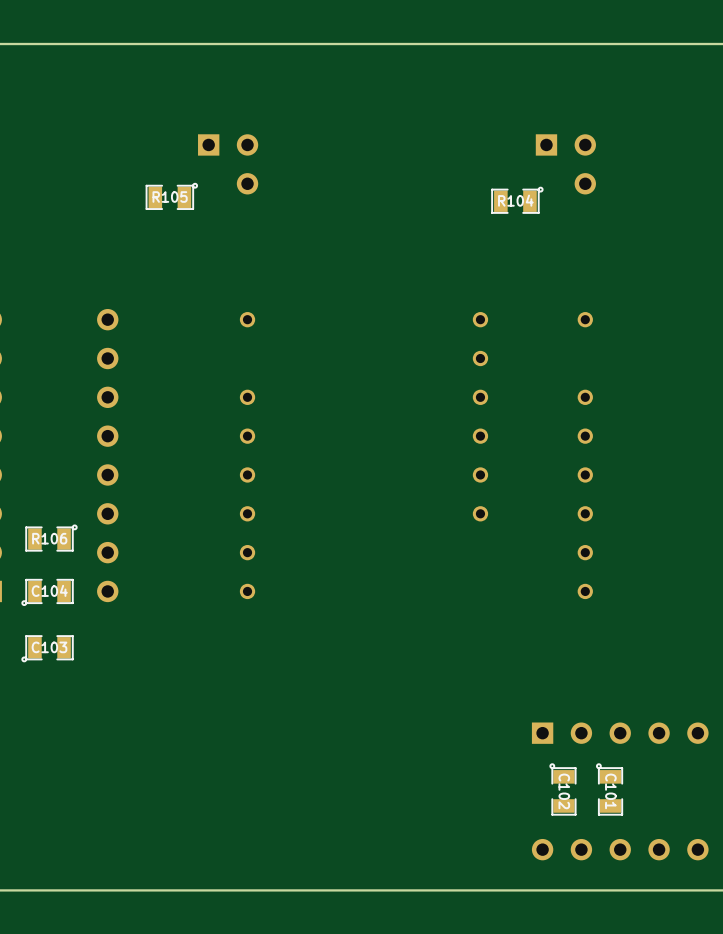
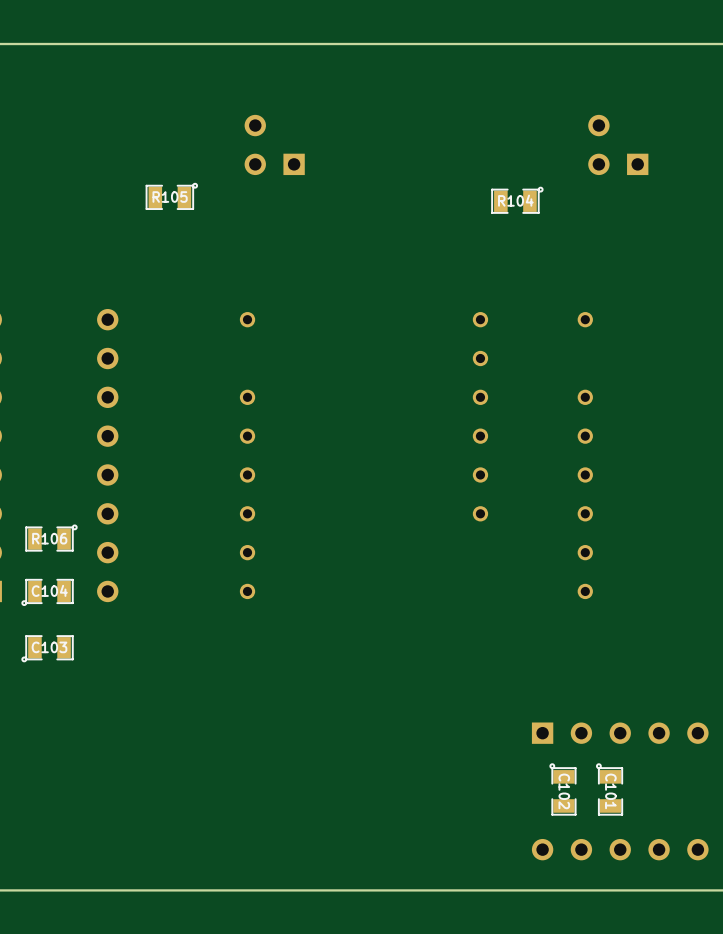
part rotation: 0° (228, 164) -> 180° (274, 144)
part position: (228, 164) -> (274, 144)
part rotation: 0° (565, 164) -> 180° (618, 144)
part position: (565, 164) -> (618, 144)

